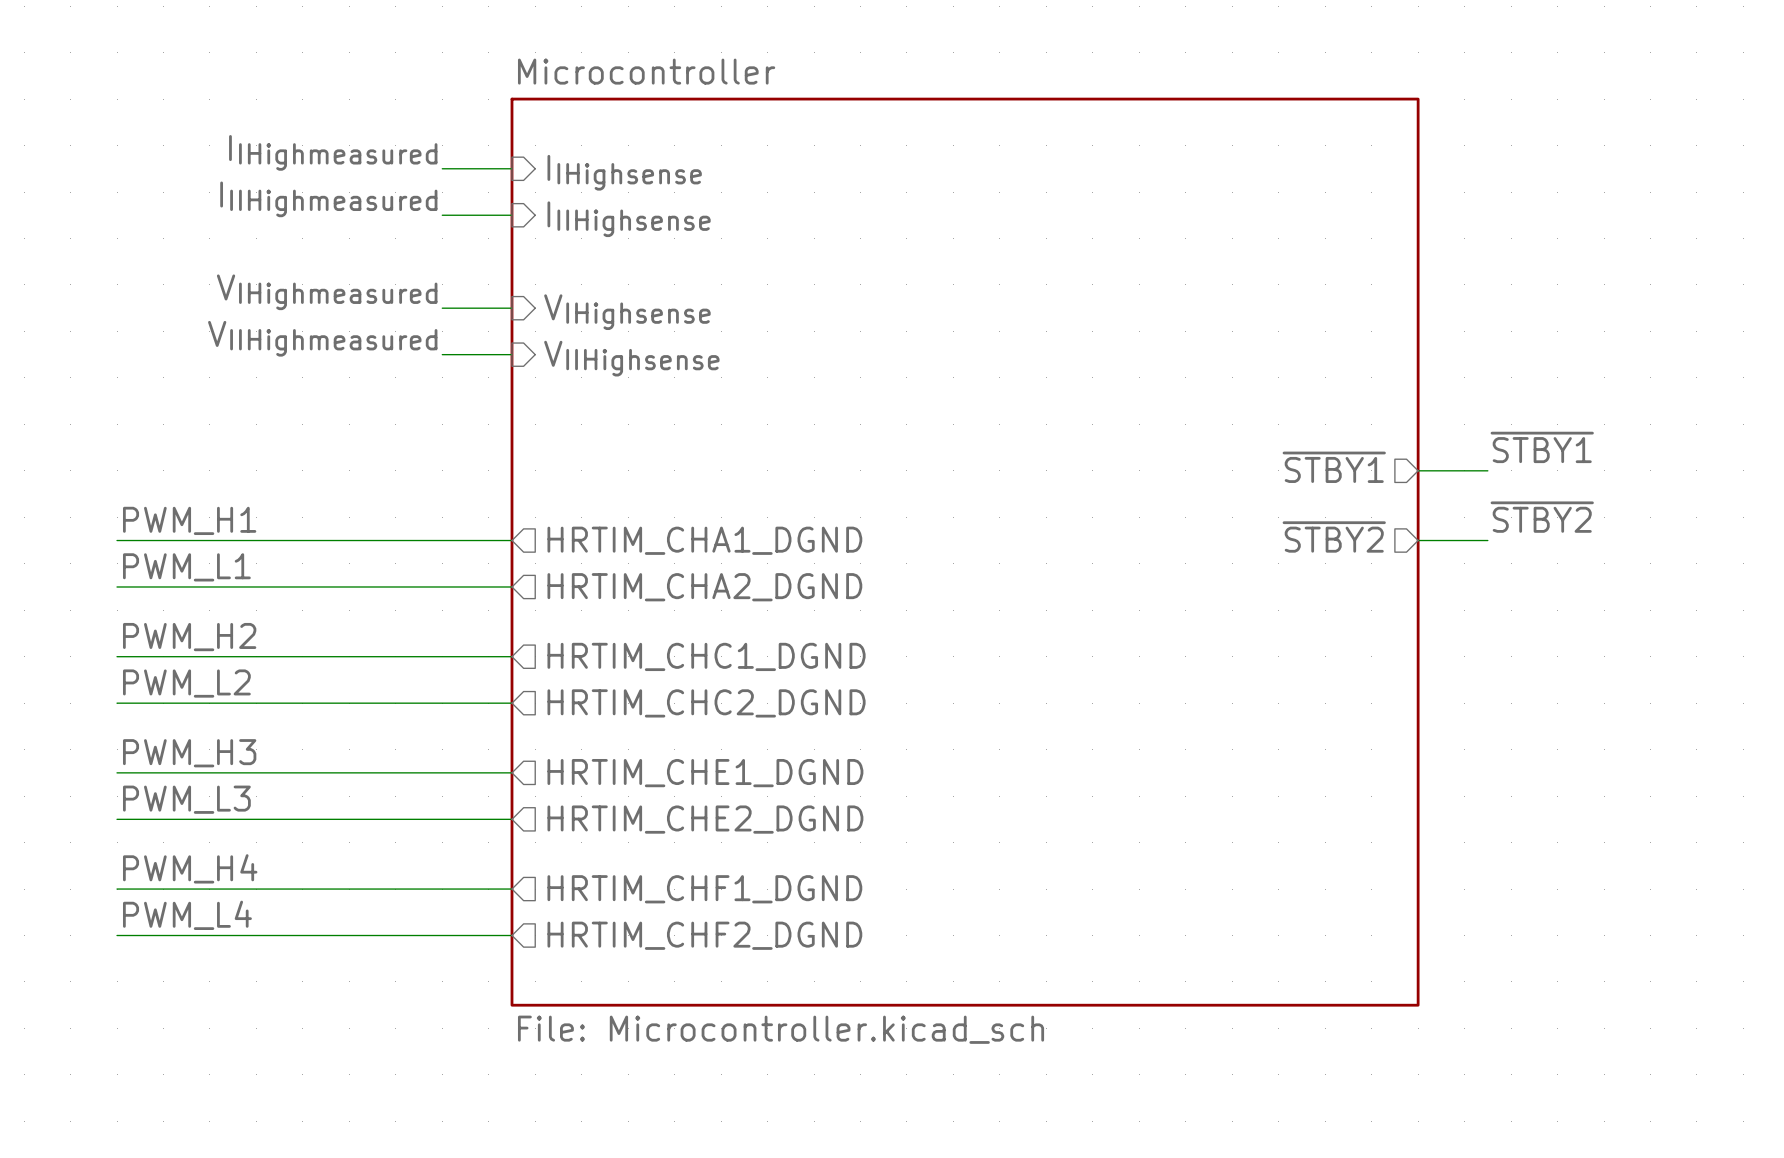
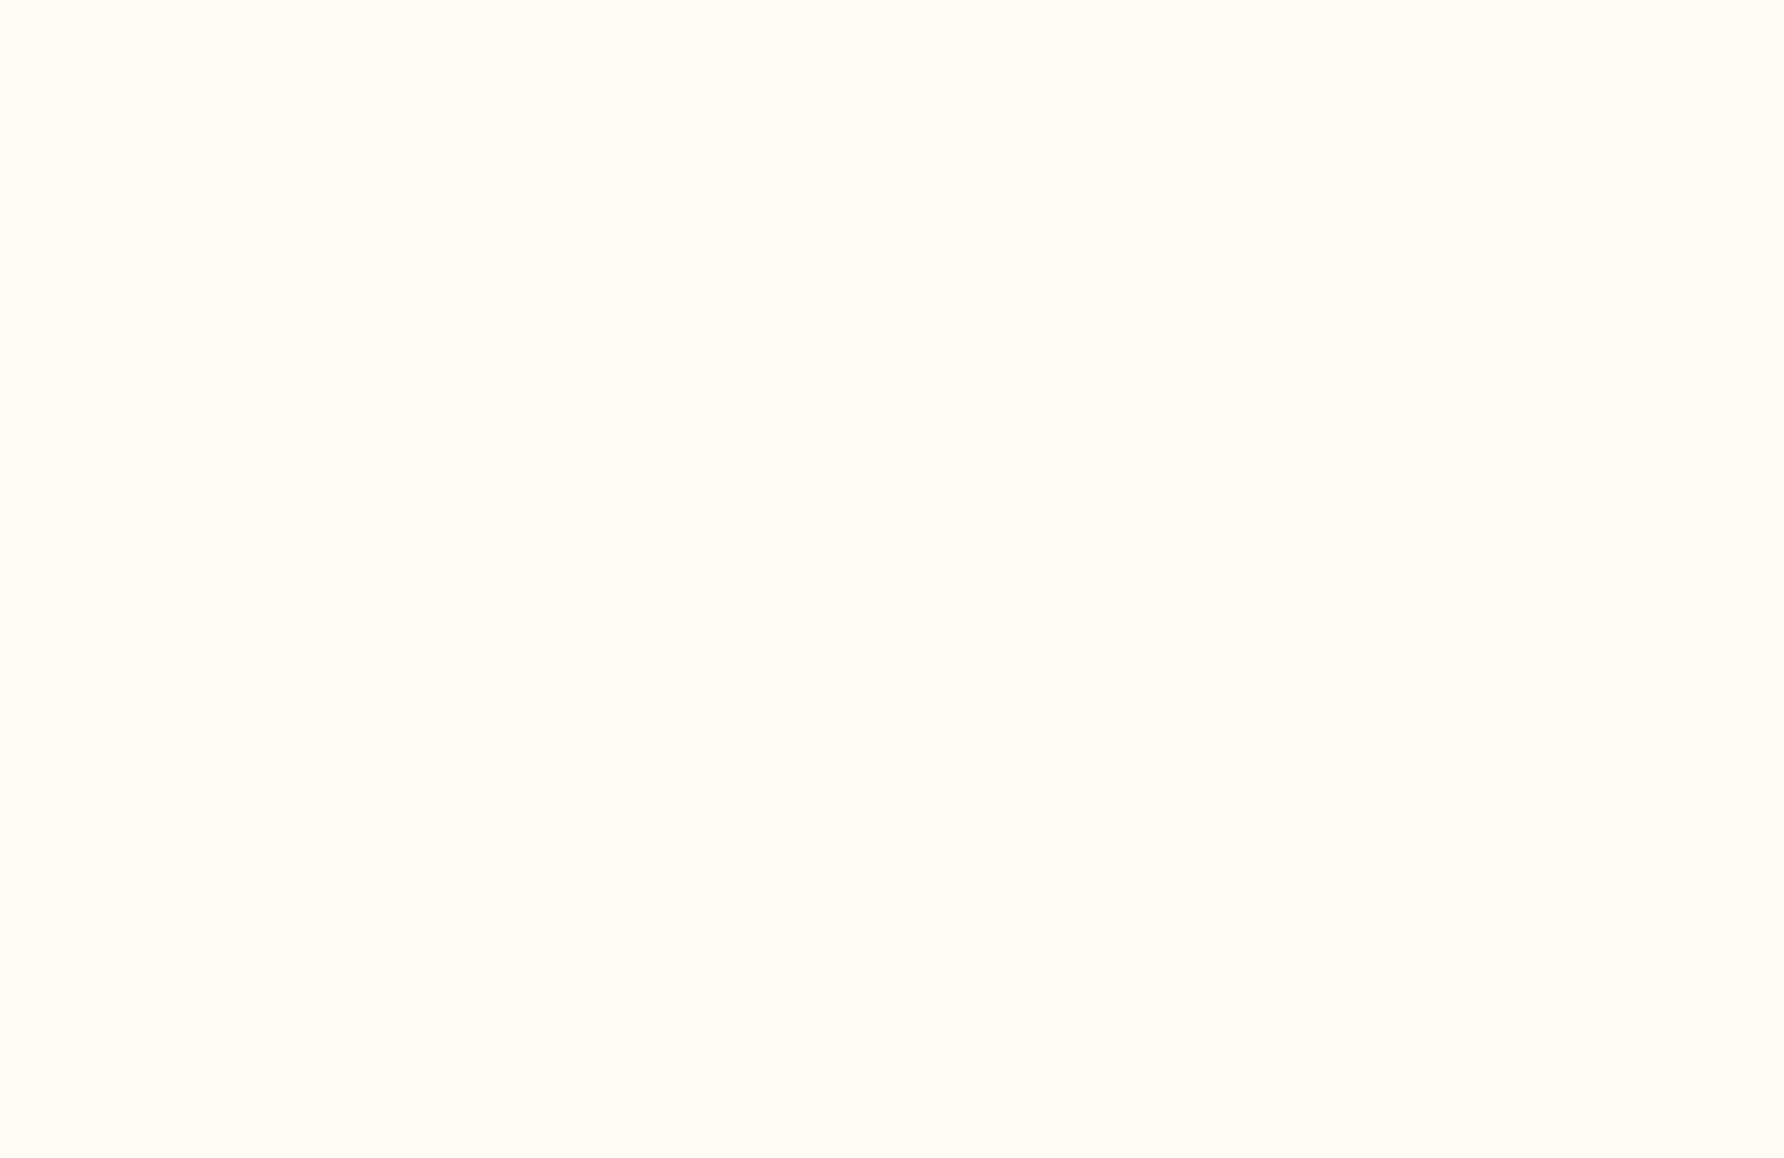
label: IIHighmeasured (333, 152) -> none
wire: (442, 168) (511, 168) -> none
sheet pin: IIHighsense (624, 172) -> none
label: IIIHighmeasured (328, 199) -> none
wire: (442, 215) (511, 215) -> none
sheet pin: IIIHighsense (629, 219) -> none
label: VIHighmeasured (327, 292) -> none
wire: (442, 308) (511, 308) -> none
sheet pin: VIHighsense (627, 312) -> none
label: VIIHighmeasured (322, 338) -> none
wire: (442, 354) (511, 354) -> none
sheet pin: VIIHighsense (631, 358) -> none
label: ~{STBY1} (1542, 447) -> none
sheet pin: ~{STBY1} (1334, 467) -> none
wire: (1418, 470) (1487, 470) -> none
label: ~{STBY2} (1542, 517) -> none
label: PWM_H1 (189, 520) -> none
sheet pin: ~{STBY2} (1334, 536) -> none
wire: (117, 540) (511, 540) -> none
sheet pin: HRTIM_CHA1_DGND (704, 540) -> none
wire: (1418, 540) (1487, 540) -> none
sheet Microcontroller: File: Microcontroller.kicad_sch (965, 552) -> none
label: PWM_L1 (186, 567) -> none
wire: (117, 586) (511, 586) -> none
sheet pin: HRTIM_CHA2_DGND (704, 587) -> none
label: PWM_H2 (189, 637) -> none
wire: (117, 656) (511, 656) -> none
sheet pin: HRTIM_CHC1_DGND (706, 656) -> none
label: PWM_L2 (186, 683) -> none
wire: (117, 703) (511, 703) -> none
sheet pin: HRTIM_CHC2_DGND (706, 703) -> none
label: PWM_H3 (189, 753) -> none
wire: (117, 772) (511, 772) -> none
sheet pin: HRTIM_CHE1_DGND (705, 773) -> none
label: PWM_L3 (186, 799) -> none
wire: (117, 819) (511, 819) -> none
sheet pin: HRTIM_CHE2_DGND (705, 819) -> none
label: PWM_H4 (190, 868) -> none
wire: (117, 889) (511, 889) -> none
sheet pin: HRTIM_CHF1_DGND (704, 889) -> none
label: PWM_L4 (187, 915) -> none
wire: (117, 935) (511, 935) -> none
sheet pin: HRTIM_CHF2_DGND (704, 935) -> none

